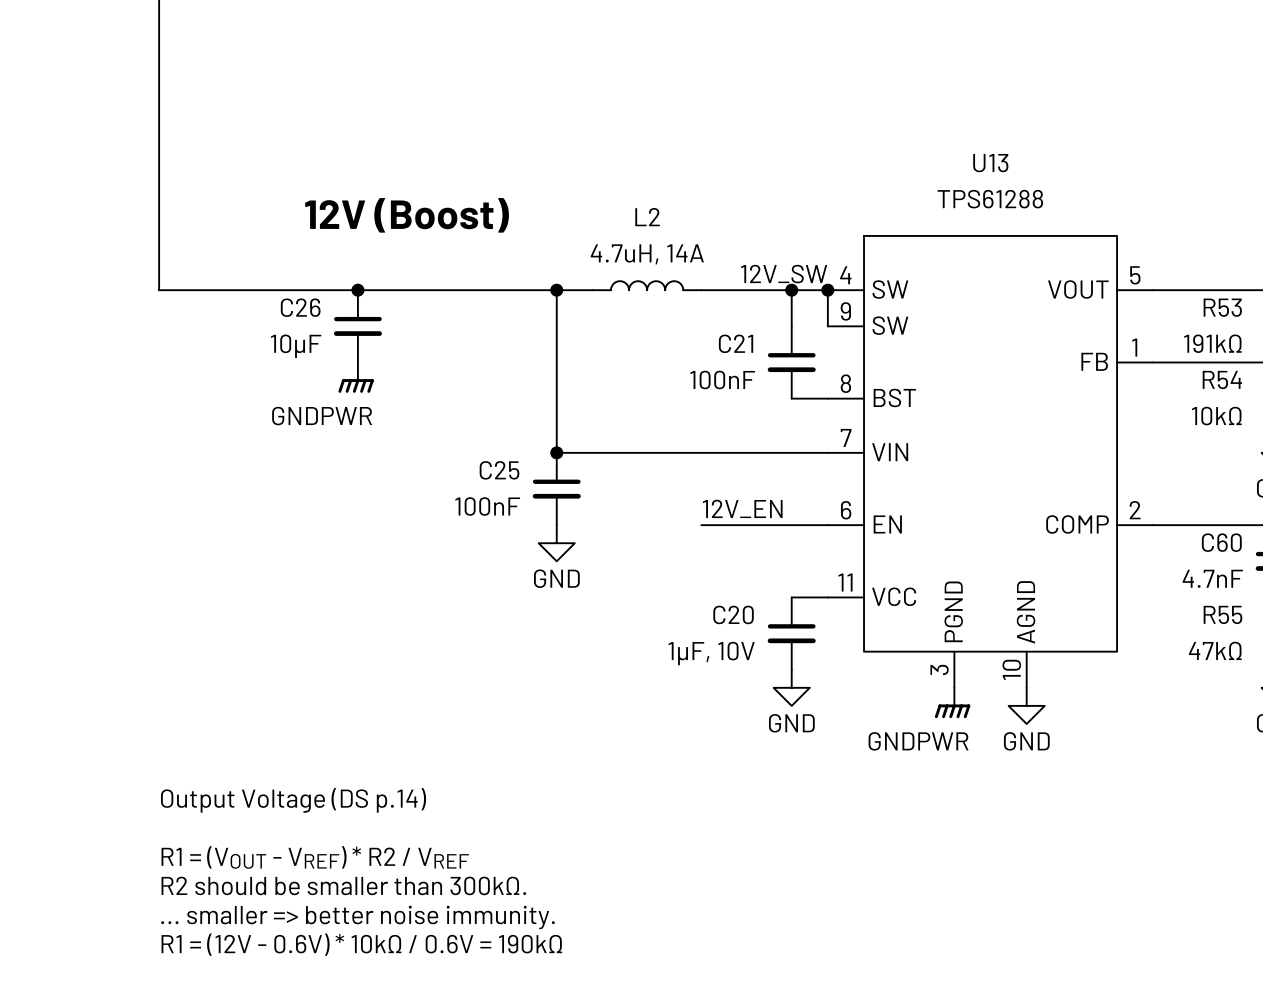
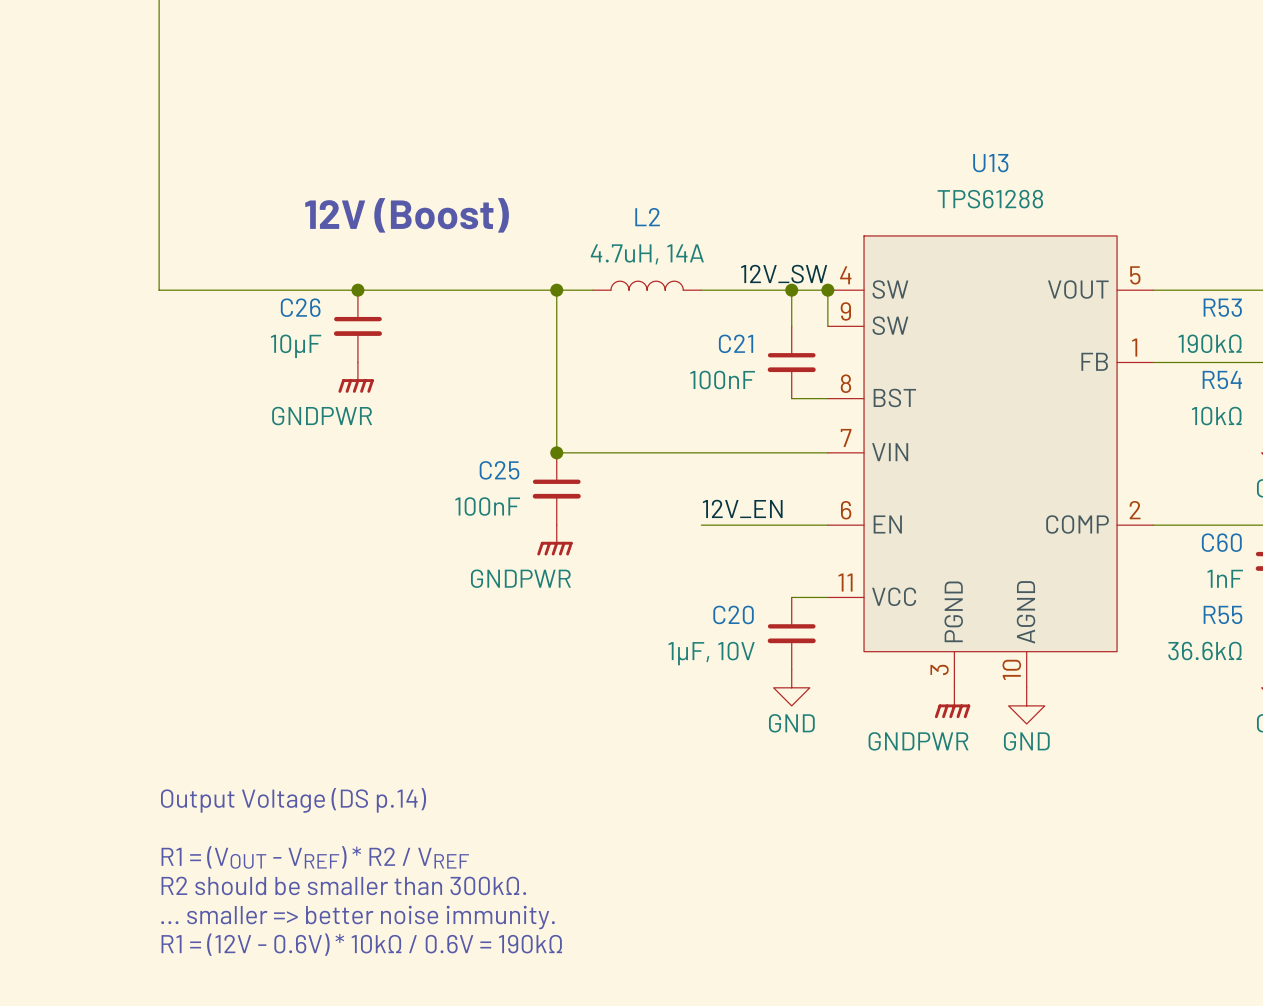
R53 value: 191kΩ (1212, 343) -> 190kΩ (1210, 343)
power symbol: GND (556, 543) -> GNDPWR (554, 540)
C60 value: 4.7nF (1212, 578) -> 1nF (1225, 578)
R55 value: 47kΩ (1215, 650) -> 36.6kΩ (1205, 651)

